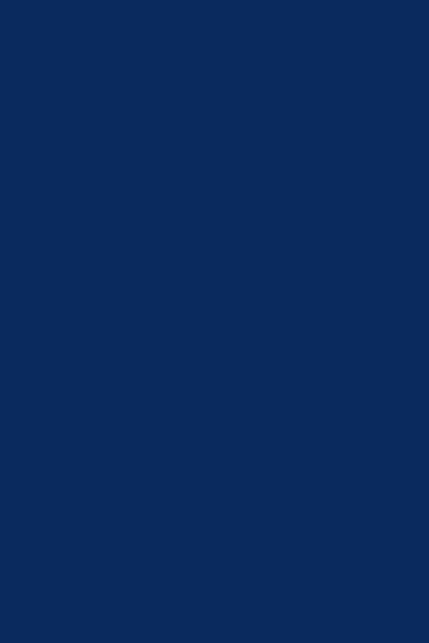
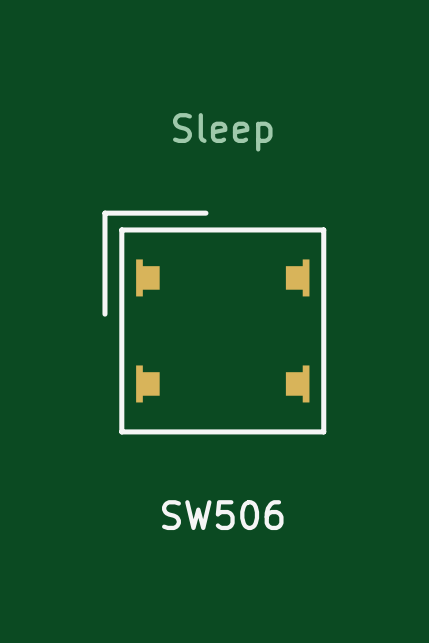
SW506: none -> Sleep (214, 322)

